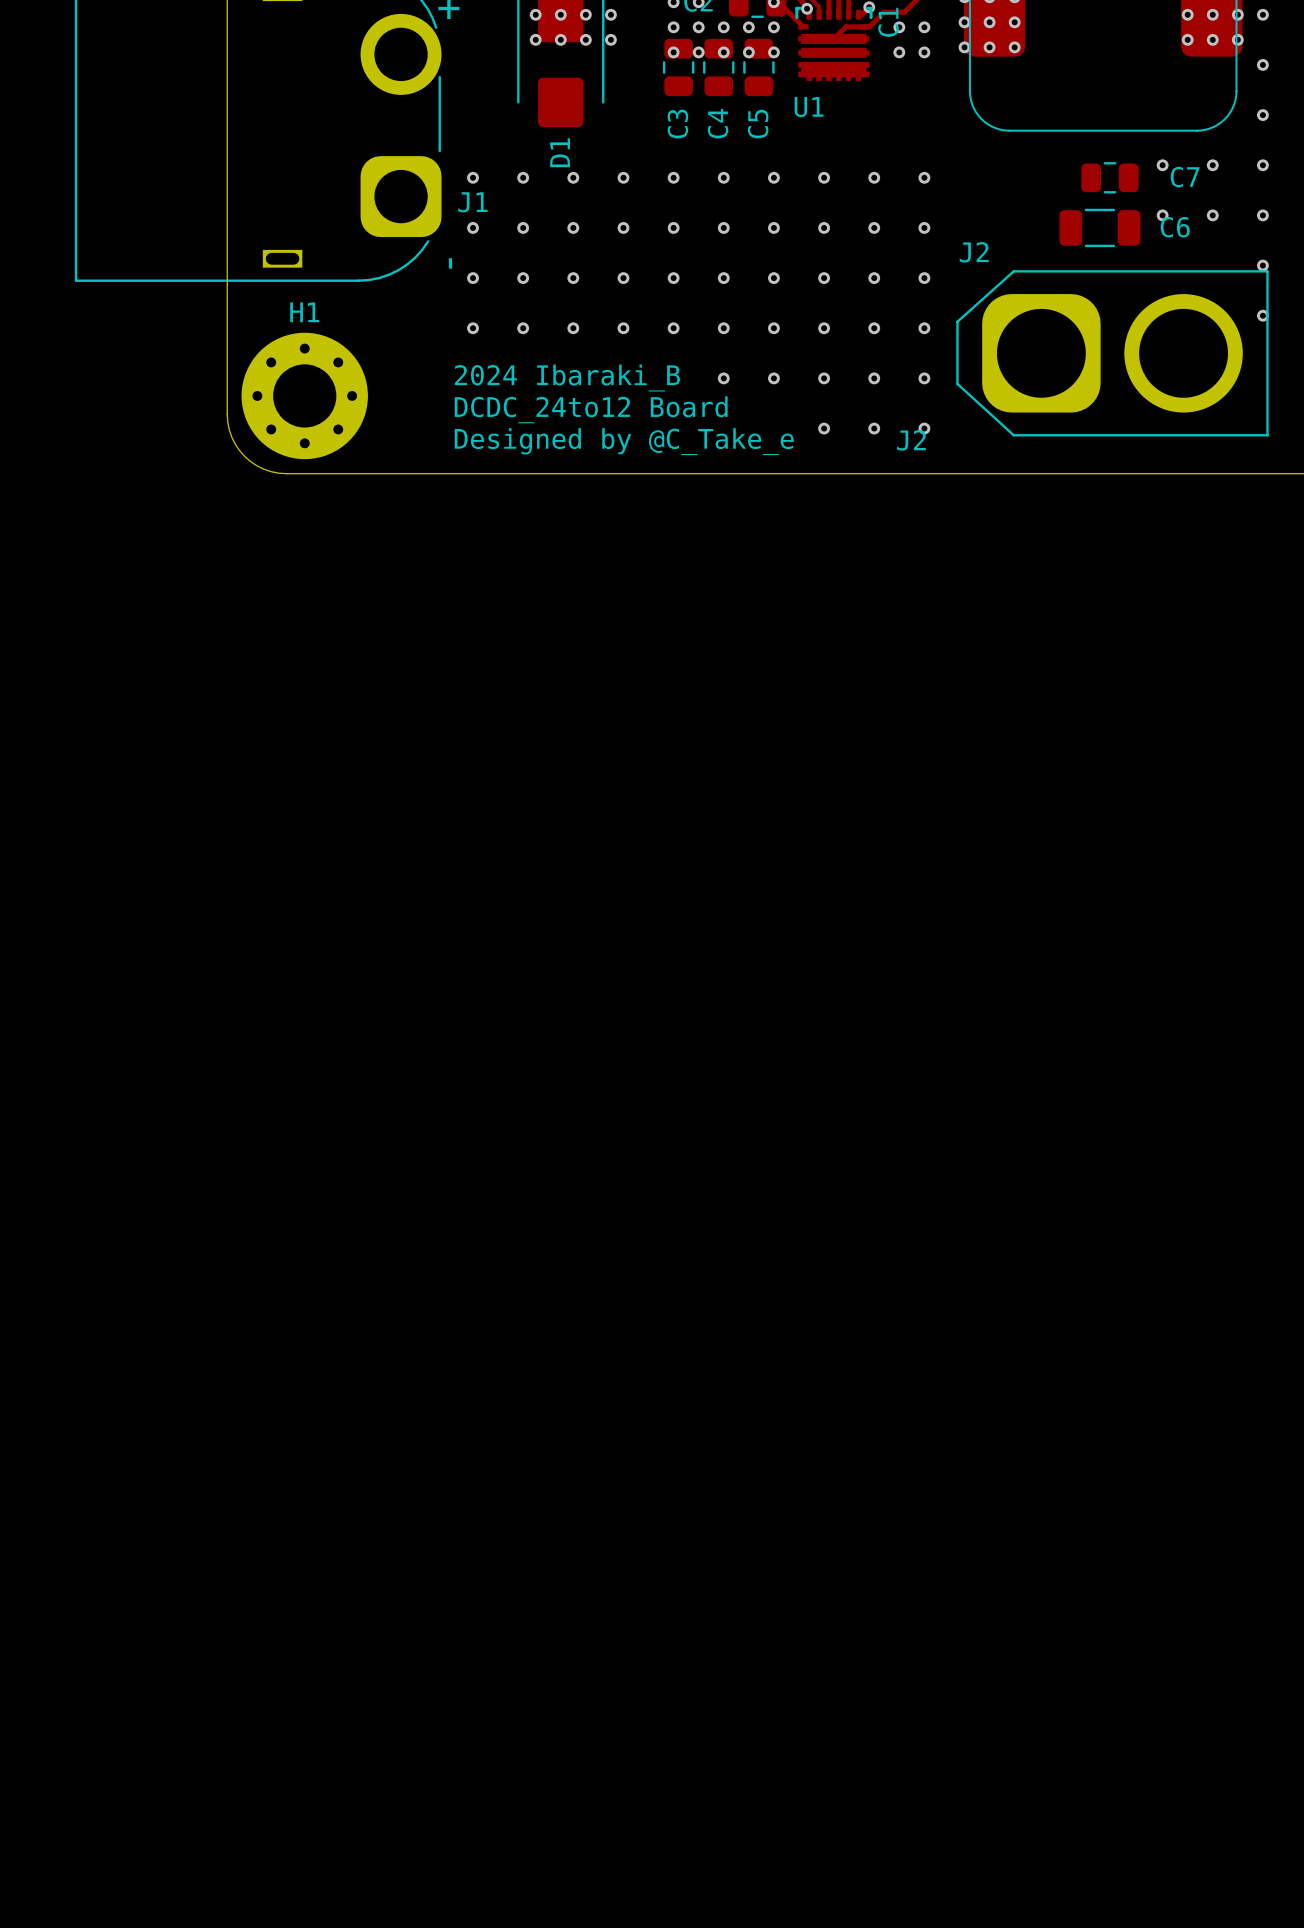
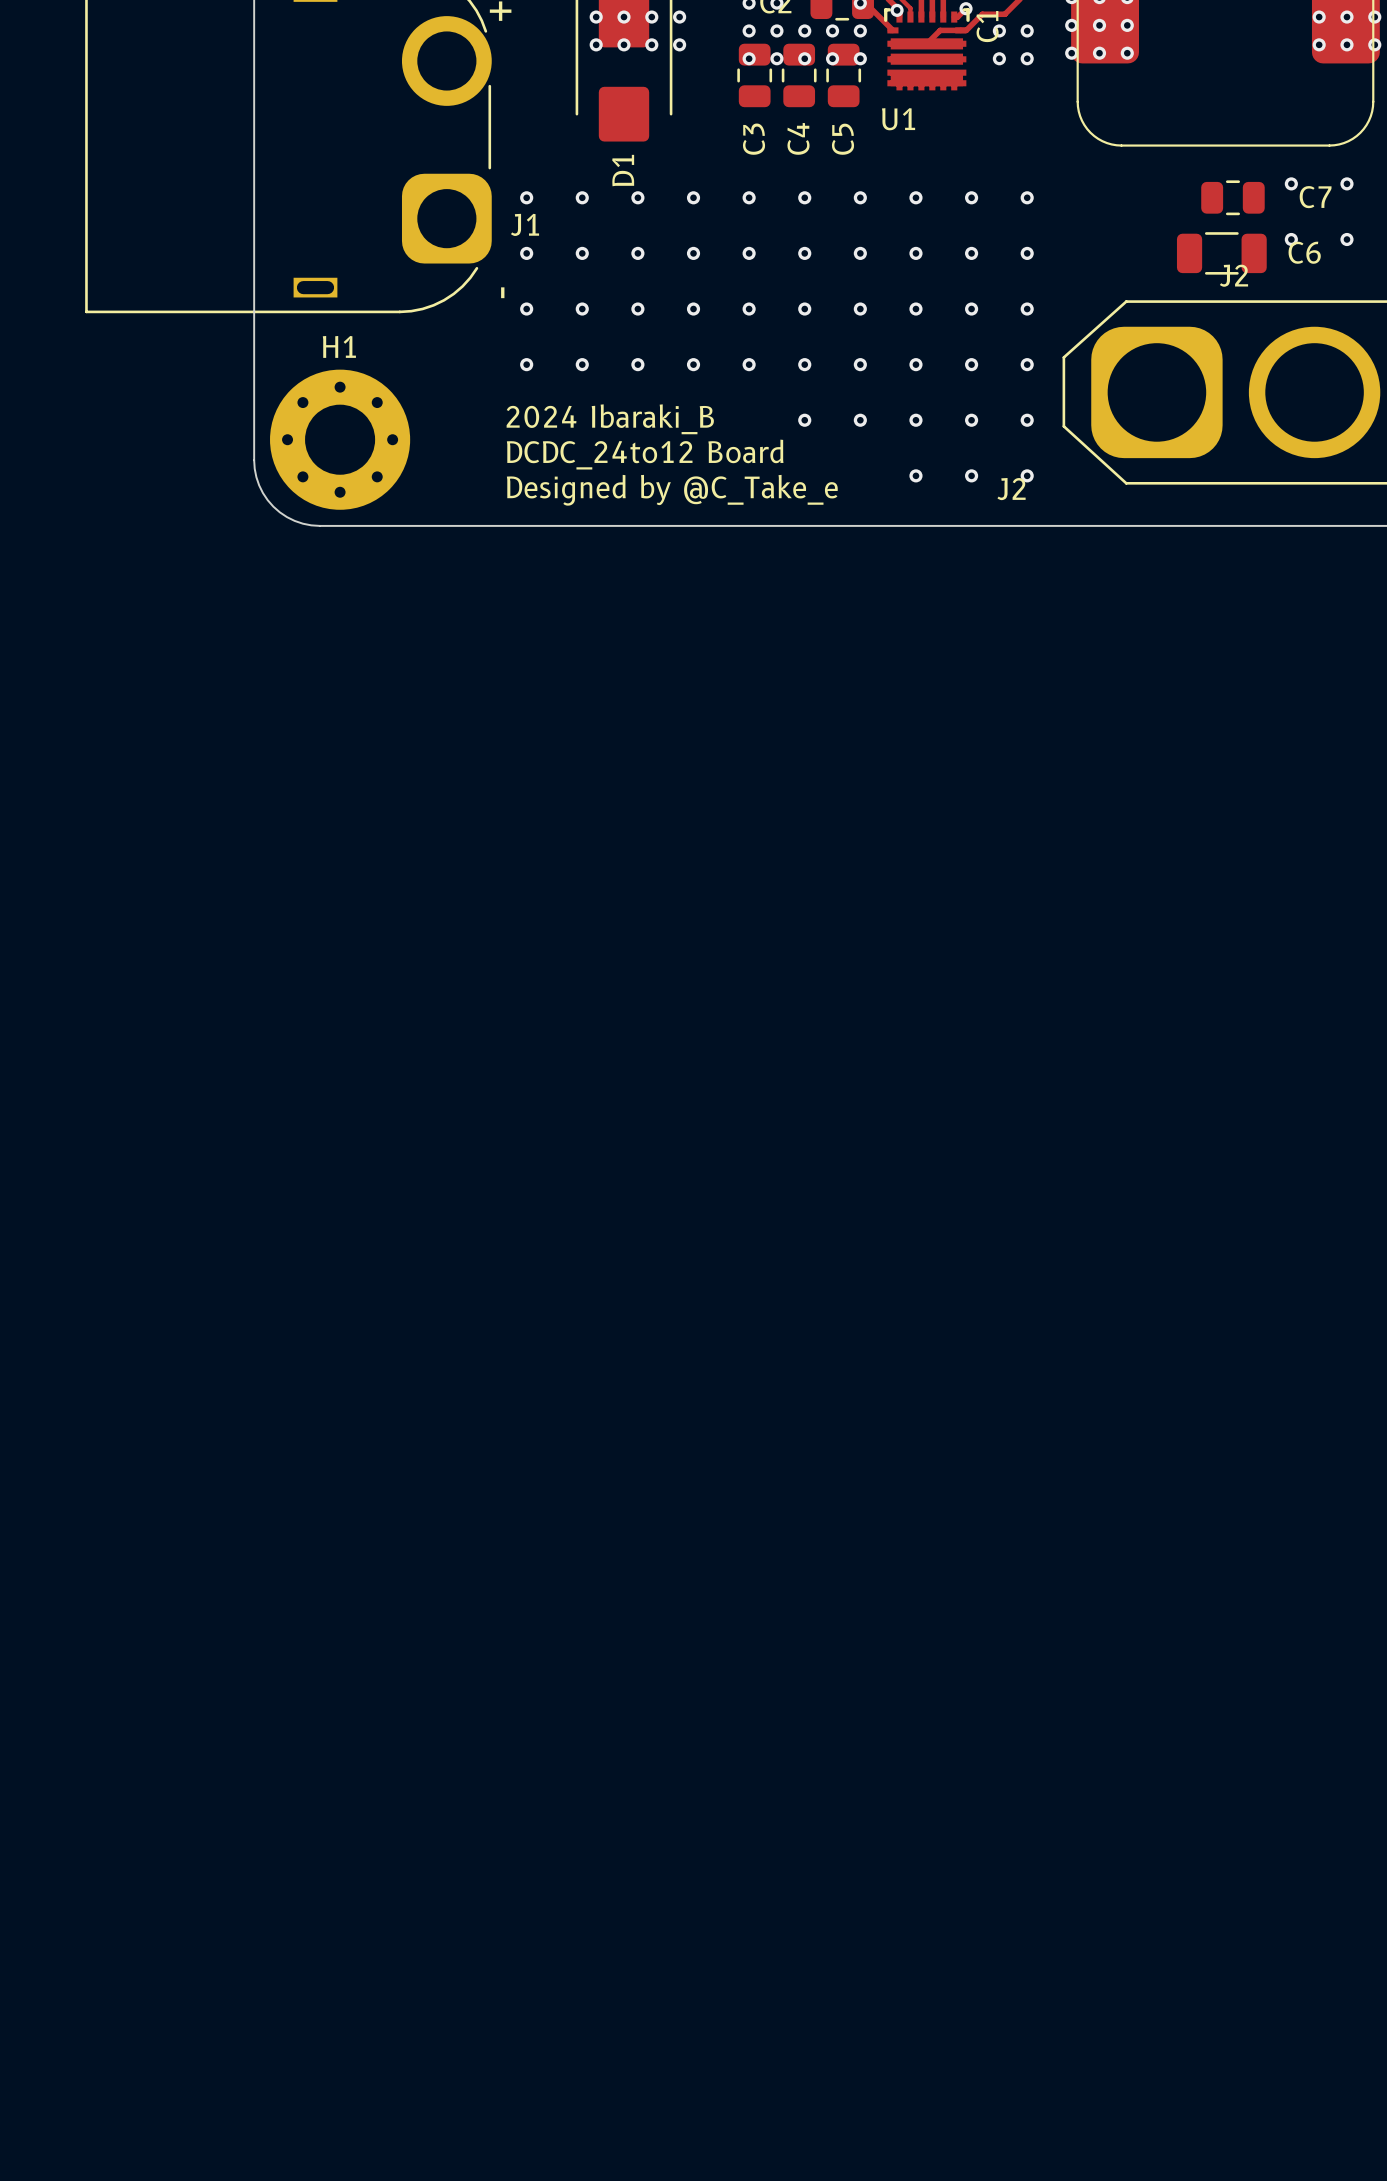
J2 name position: J2 (974, 252) -> J2 (1233, 275)

